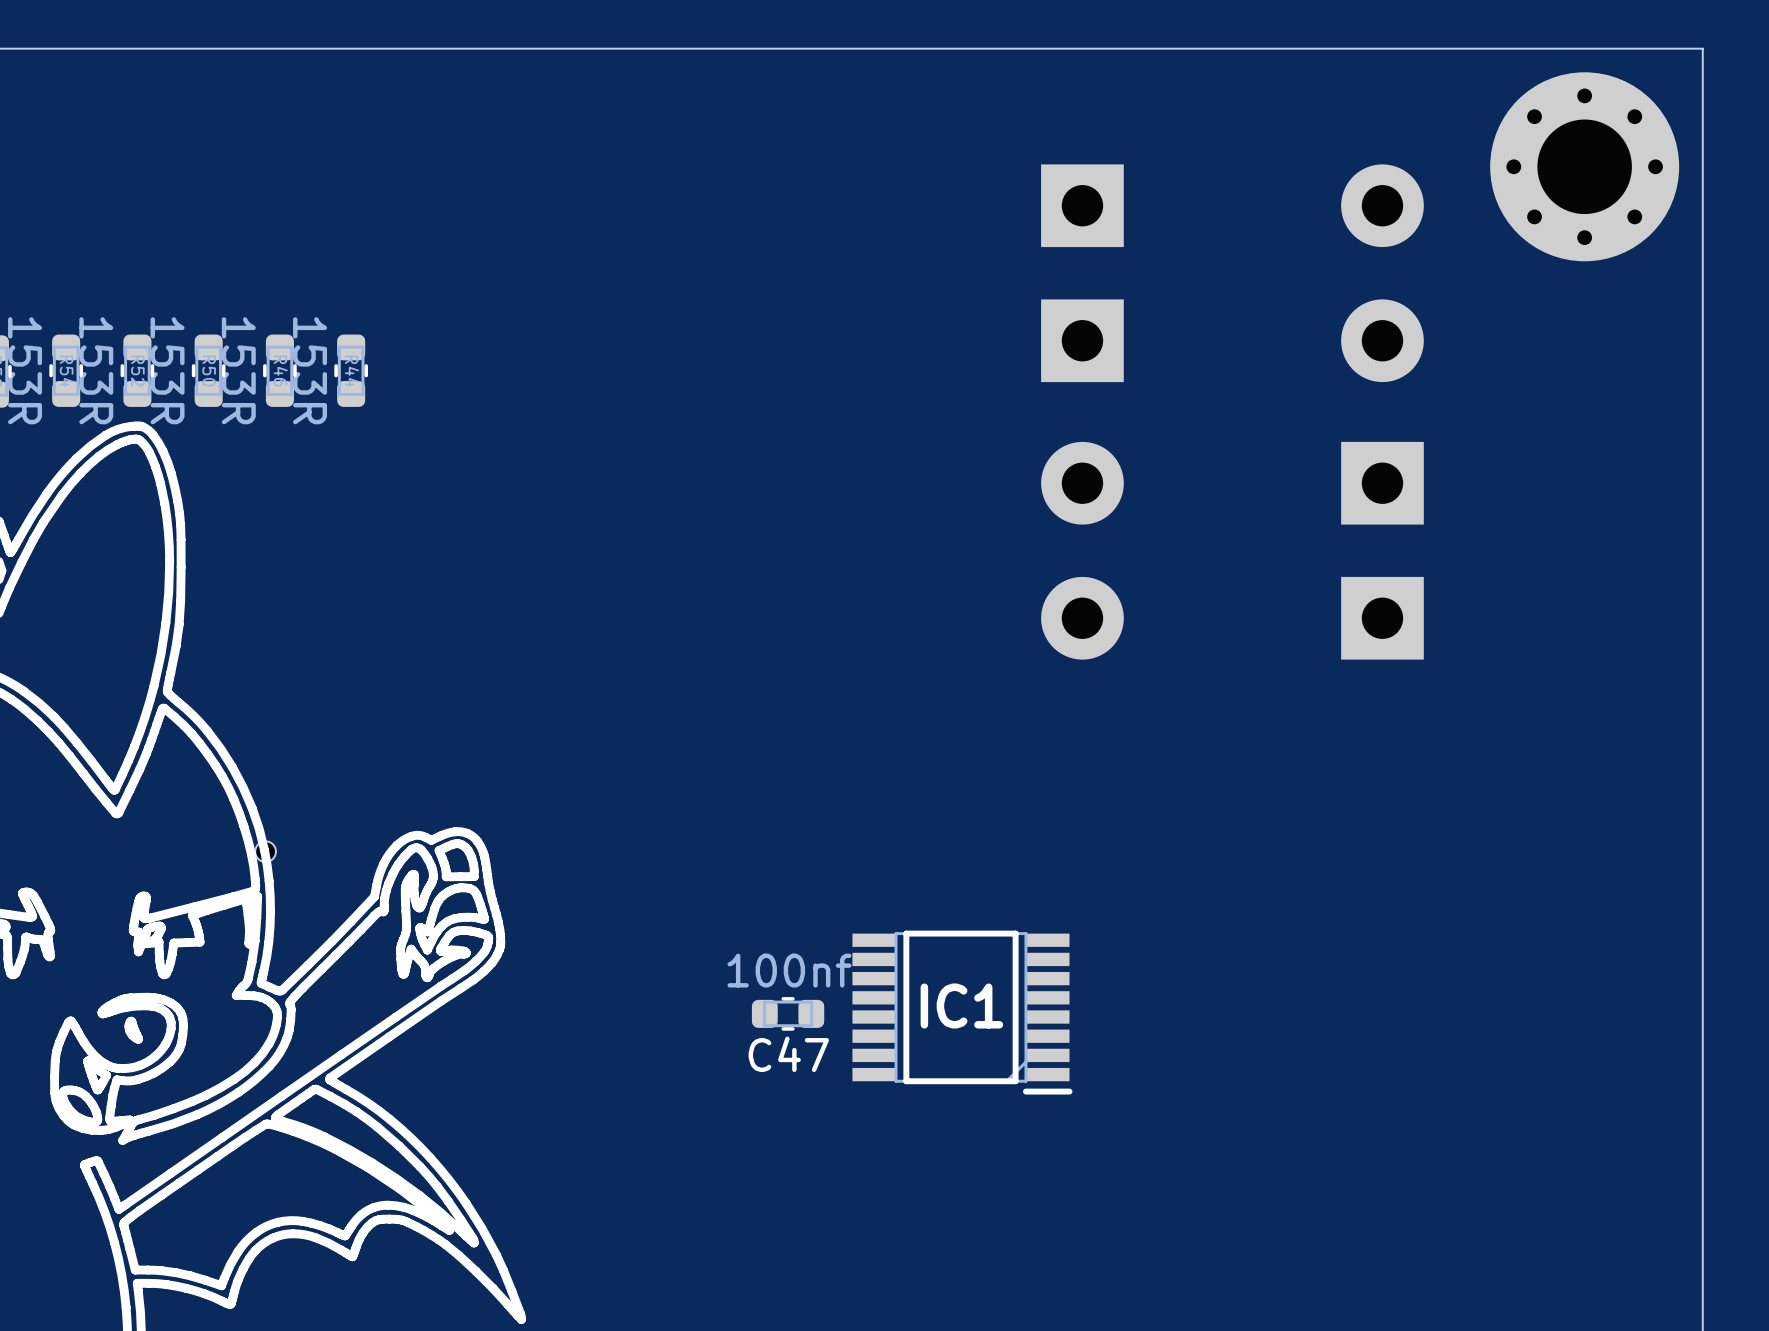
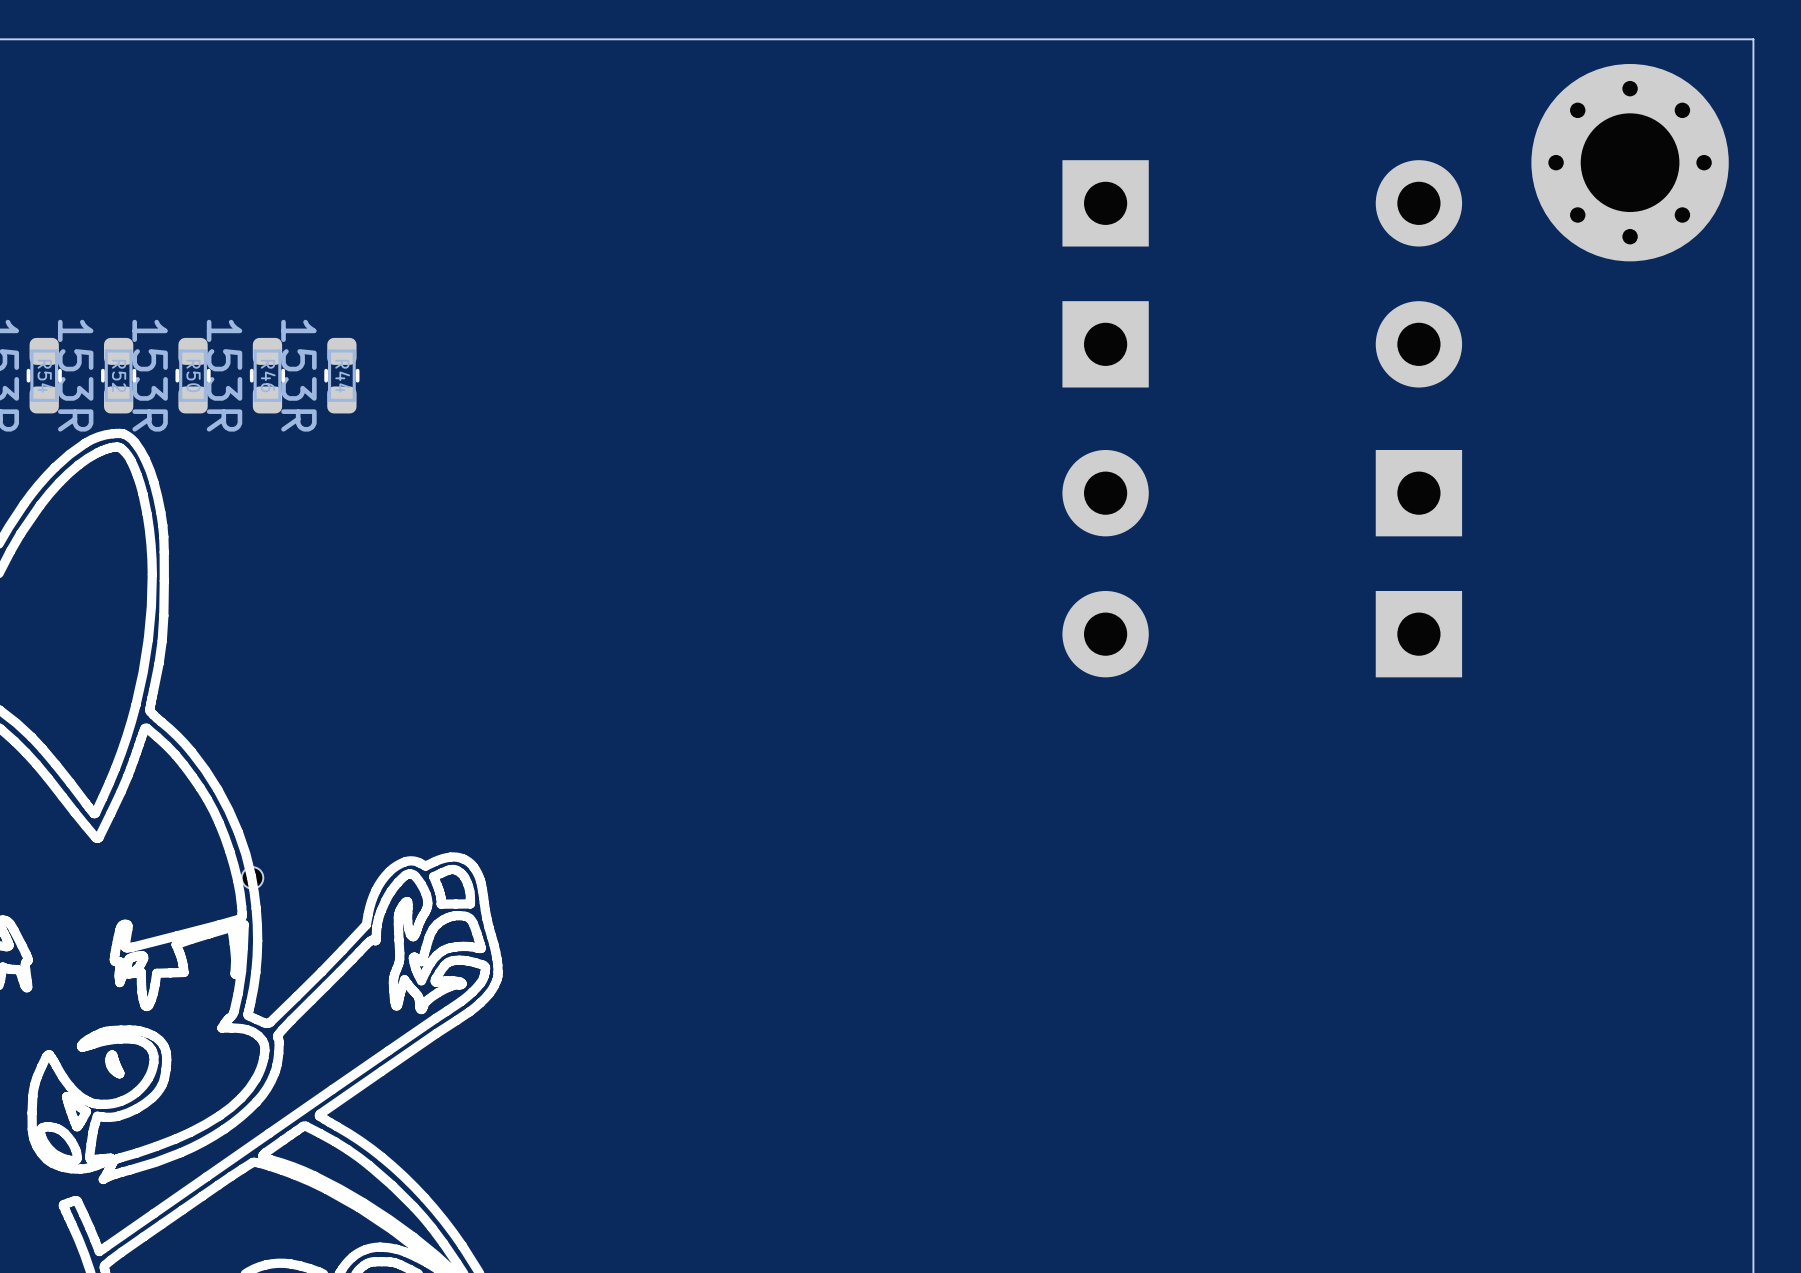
IC1: (962, 1012) -> none
C47: 100nf (788, 1013) -> none

